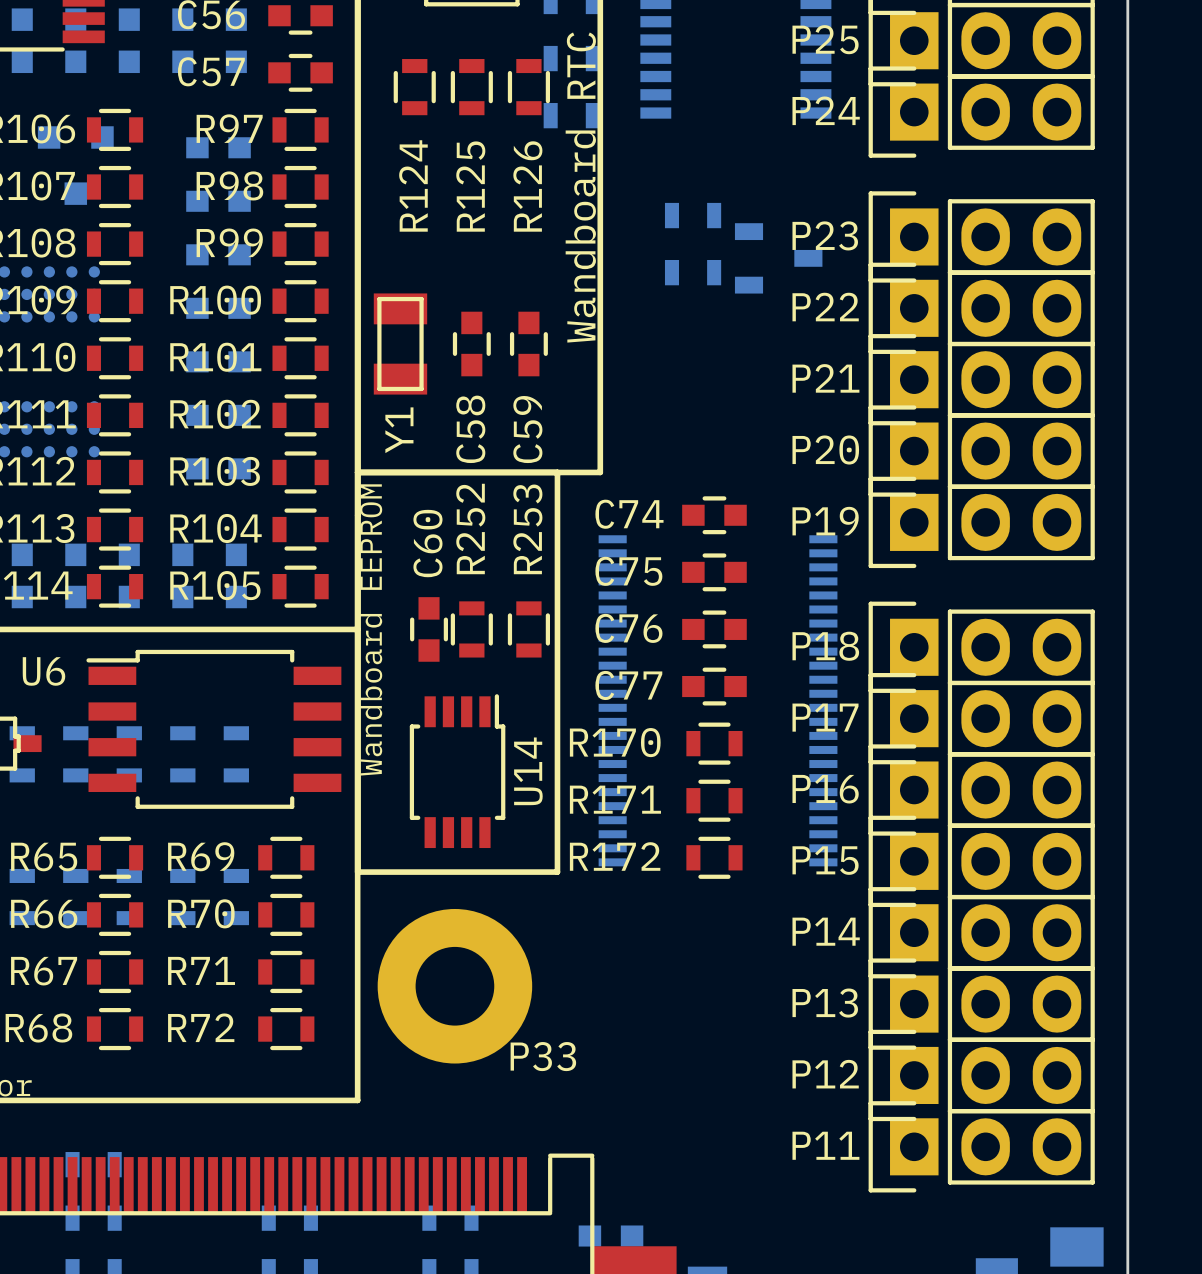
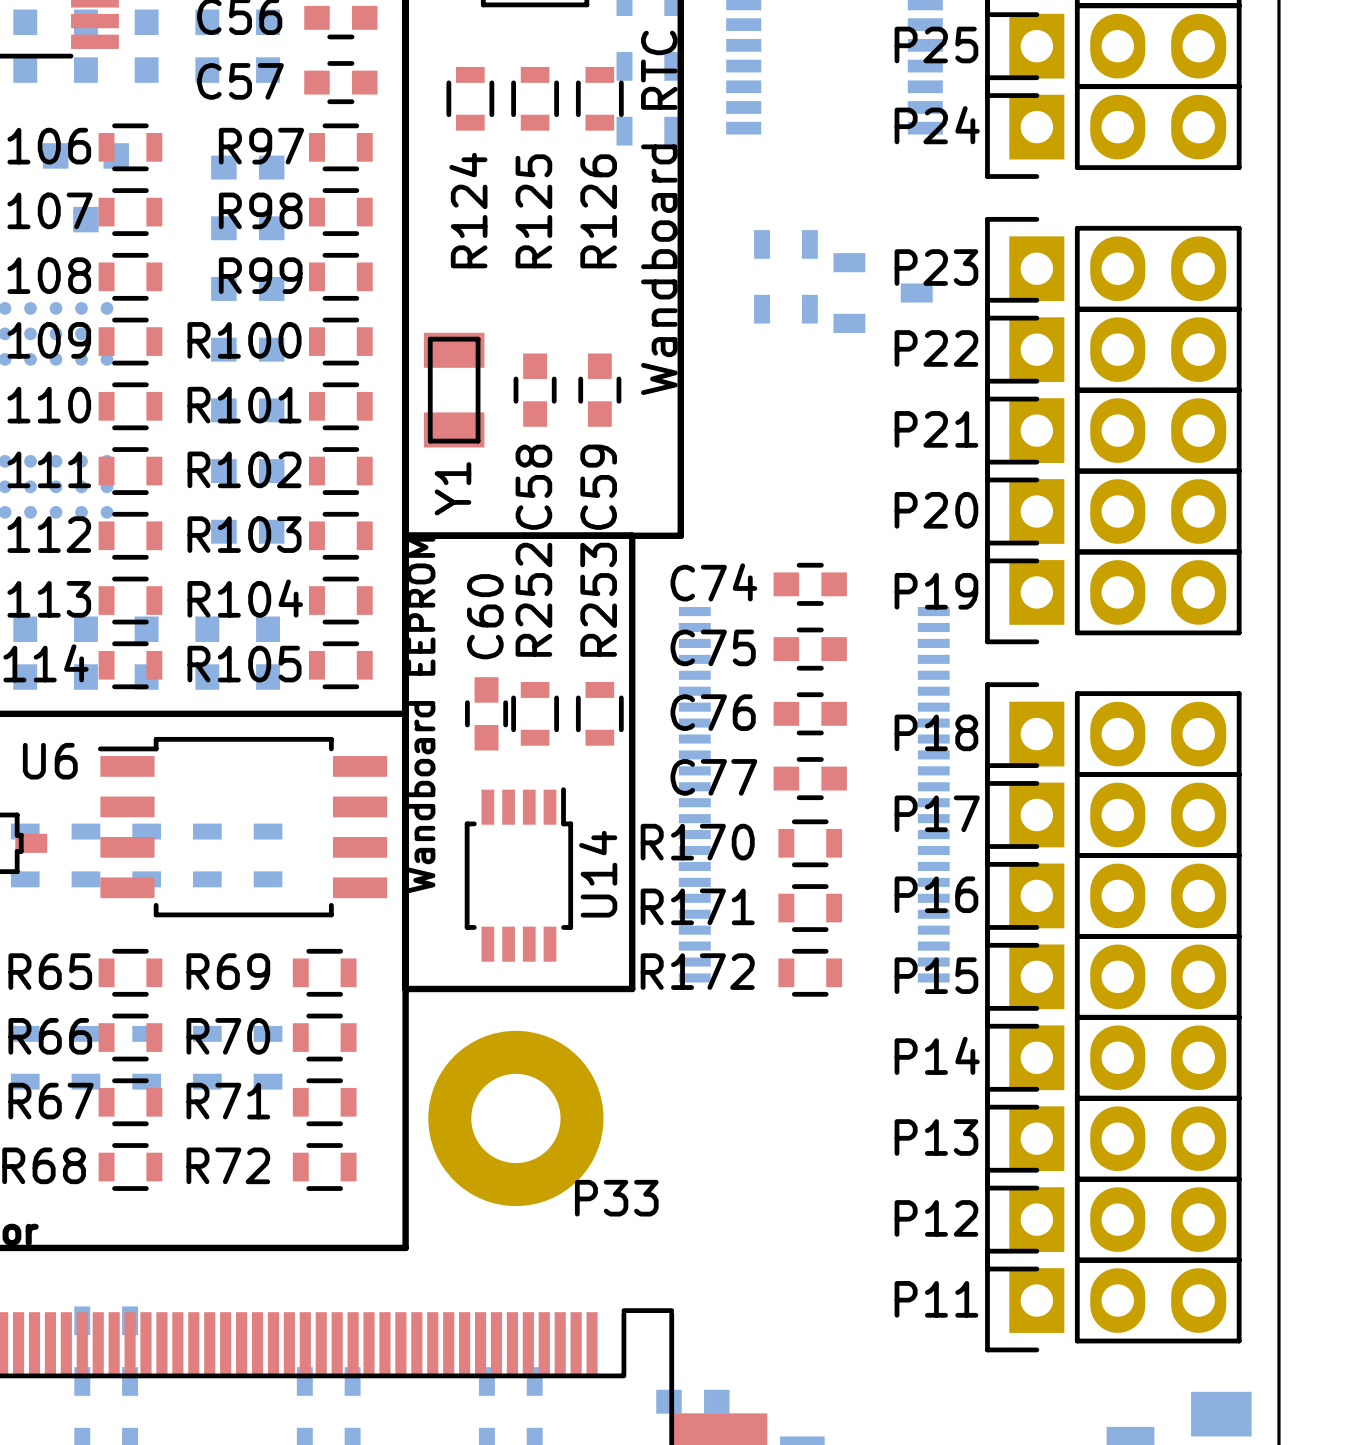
part: (22, 897) -> none
part: (75, 897) -> none
part: (129, 897) -> none
part: (182, 897) -> none
part: (236, 897) -> none
part: none -> (25, 1057)
part: none -> (85, 1057)
part: none -> (146, 1057)
part: none -> (207, 1057)
part: none -> (268, 1057)

